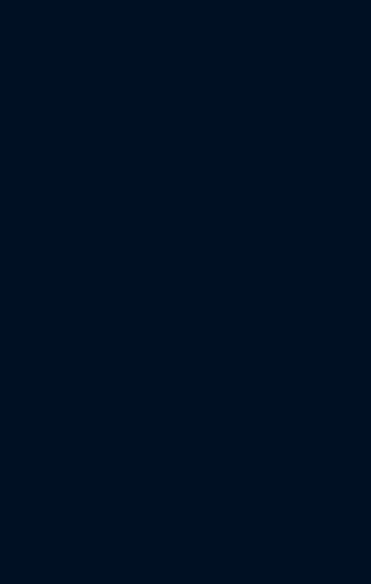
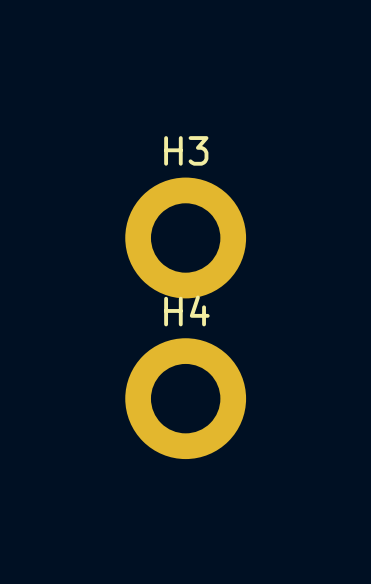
H3: none -> (185, 237)
H4: none -> (185, 398)

